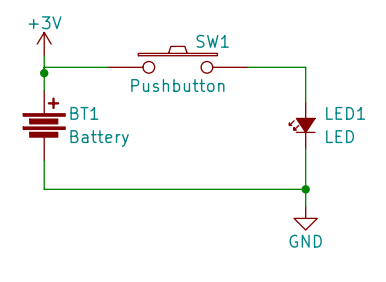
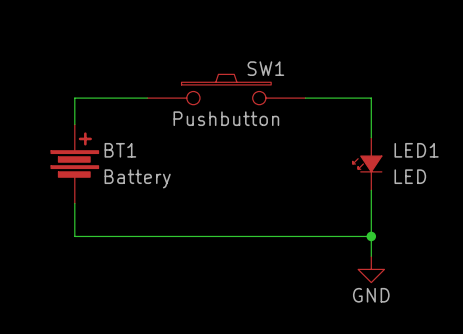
power symbol: +3V (44, 44) -> none
wire: (44, 55) (44, 67) -> none
junction: (44, 73) -> none

